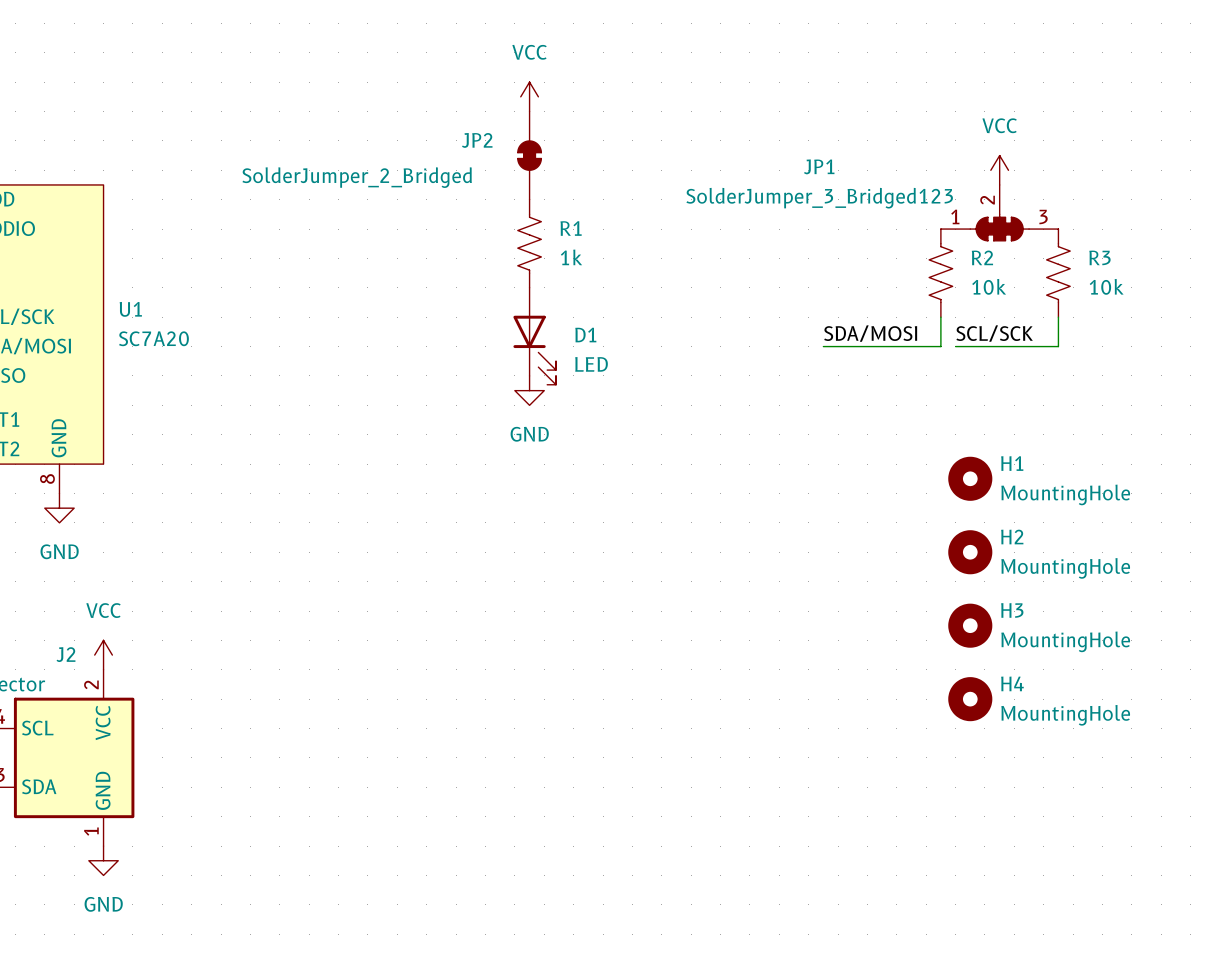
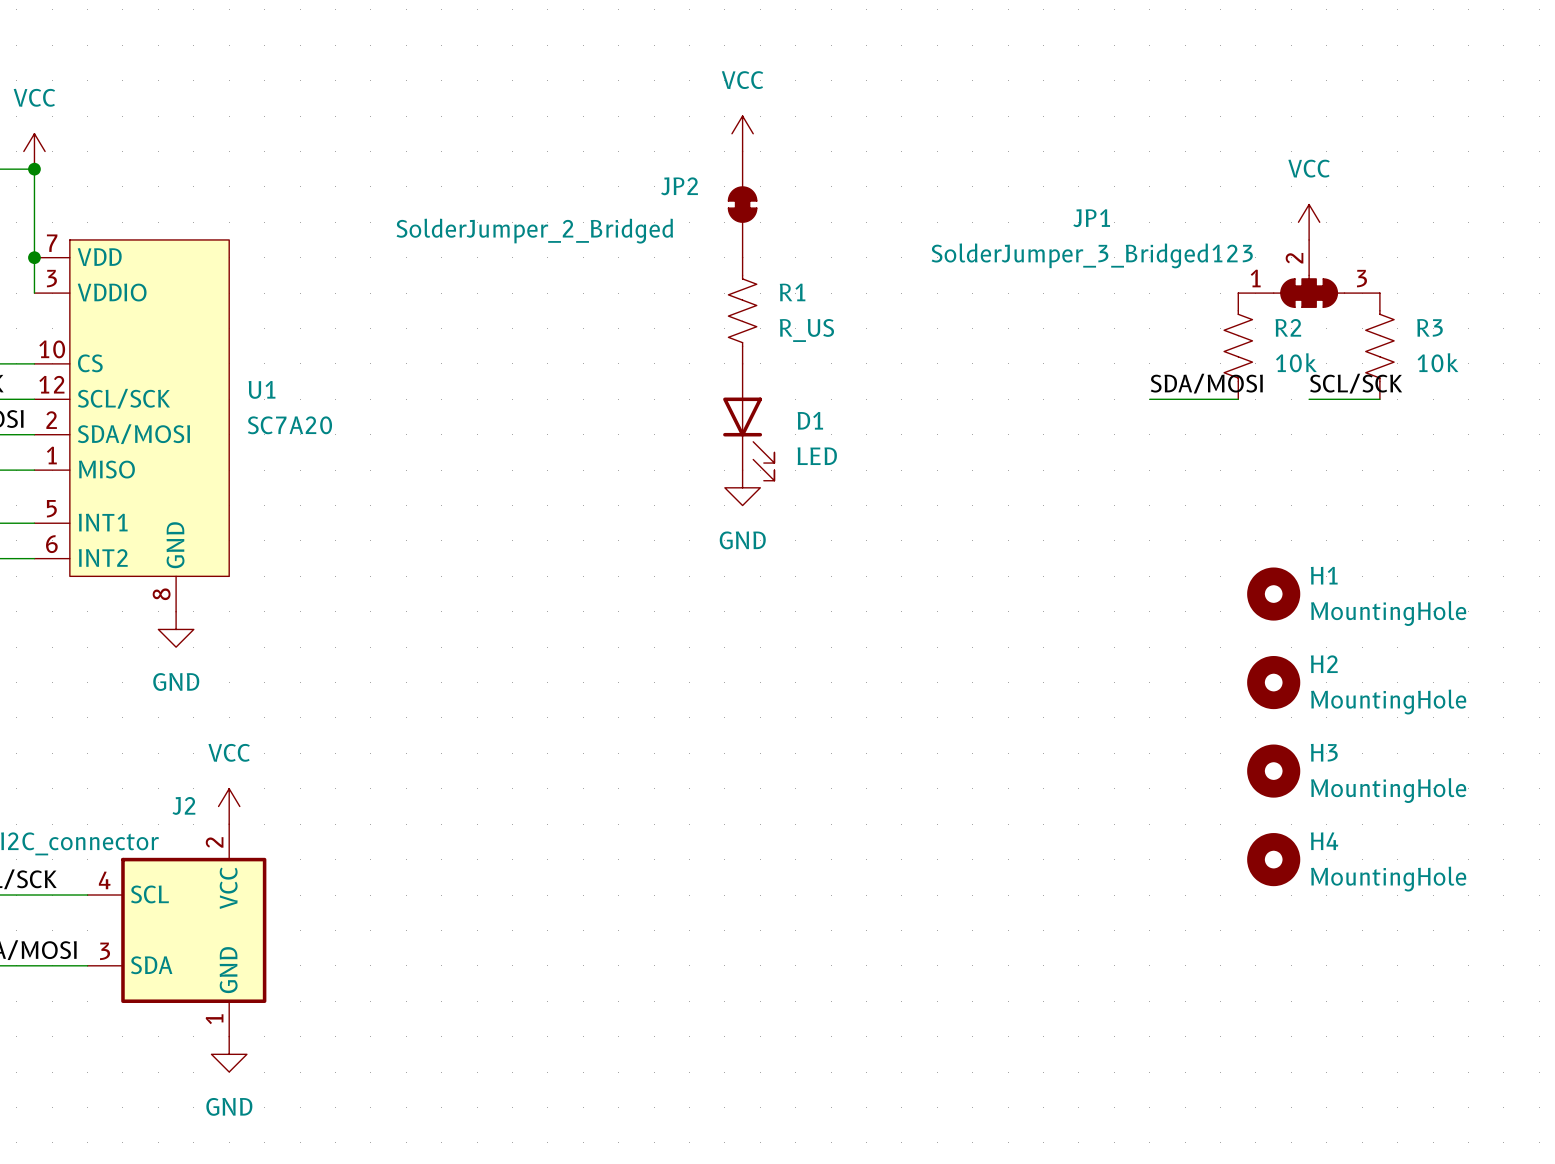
R1 value: 1k (571, 257) -> R_US (806, 330)
wire: (940, 317) (940, 346) (823, 346) -> (1238, 399) (1149, 399)
wire: (1058, 317) (1058, 346) (955, 346) -> (1379, 399) (1309, 399)
label position: SDA/MOSI (870, 333) -> SDA/MOSI (1206, 383)
label position: SCL/SCK (994, 333) -> SCL/SCK (1356, 383)

